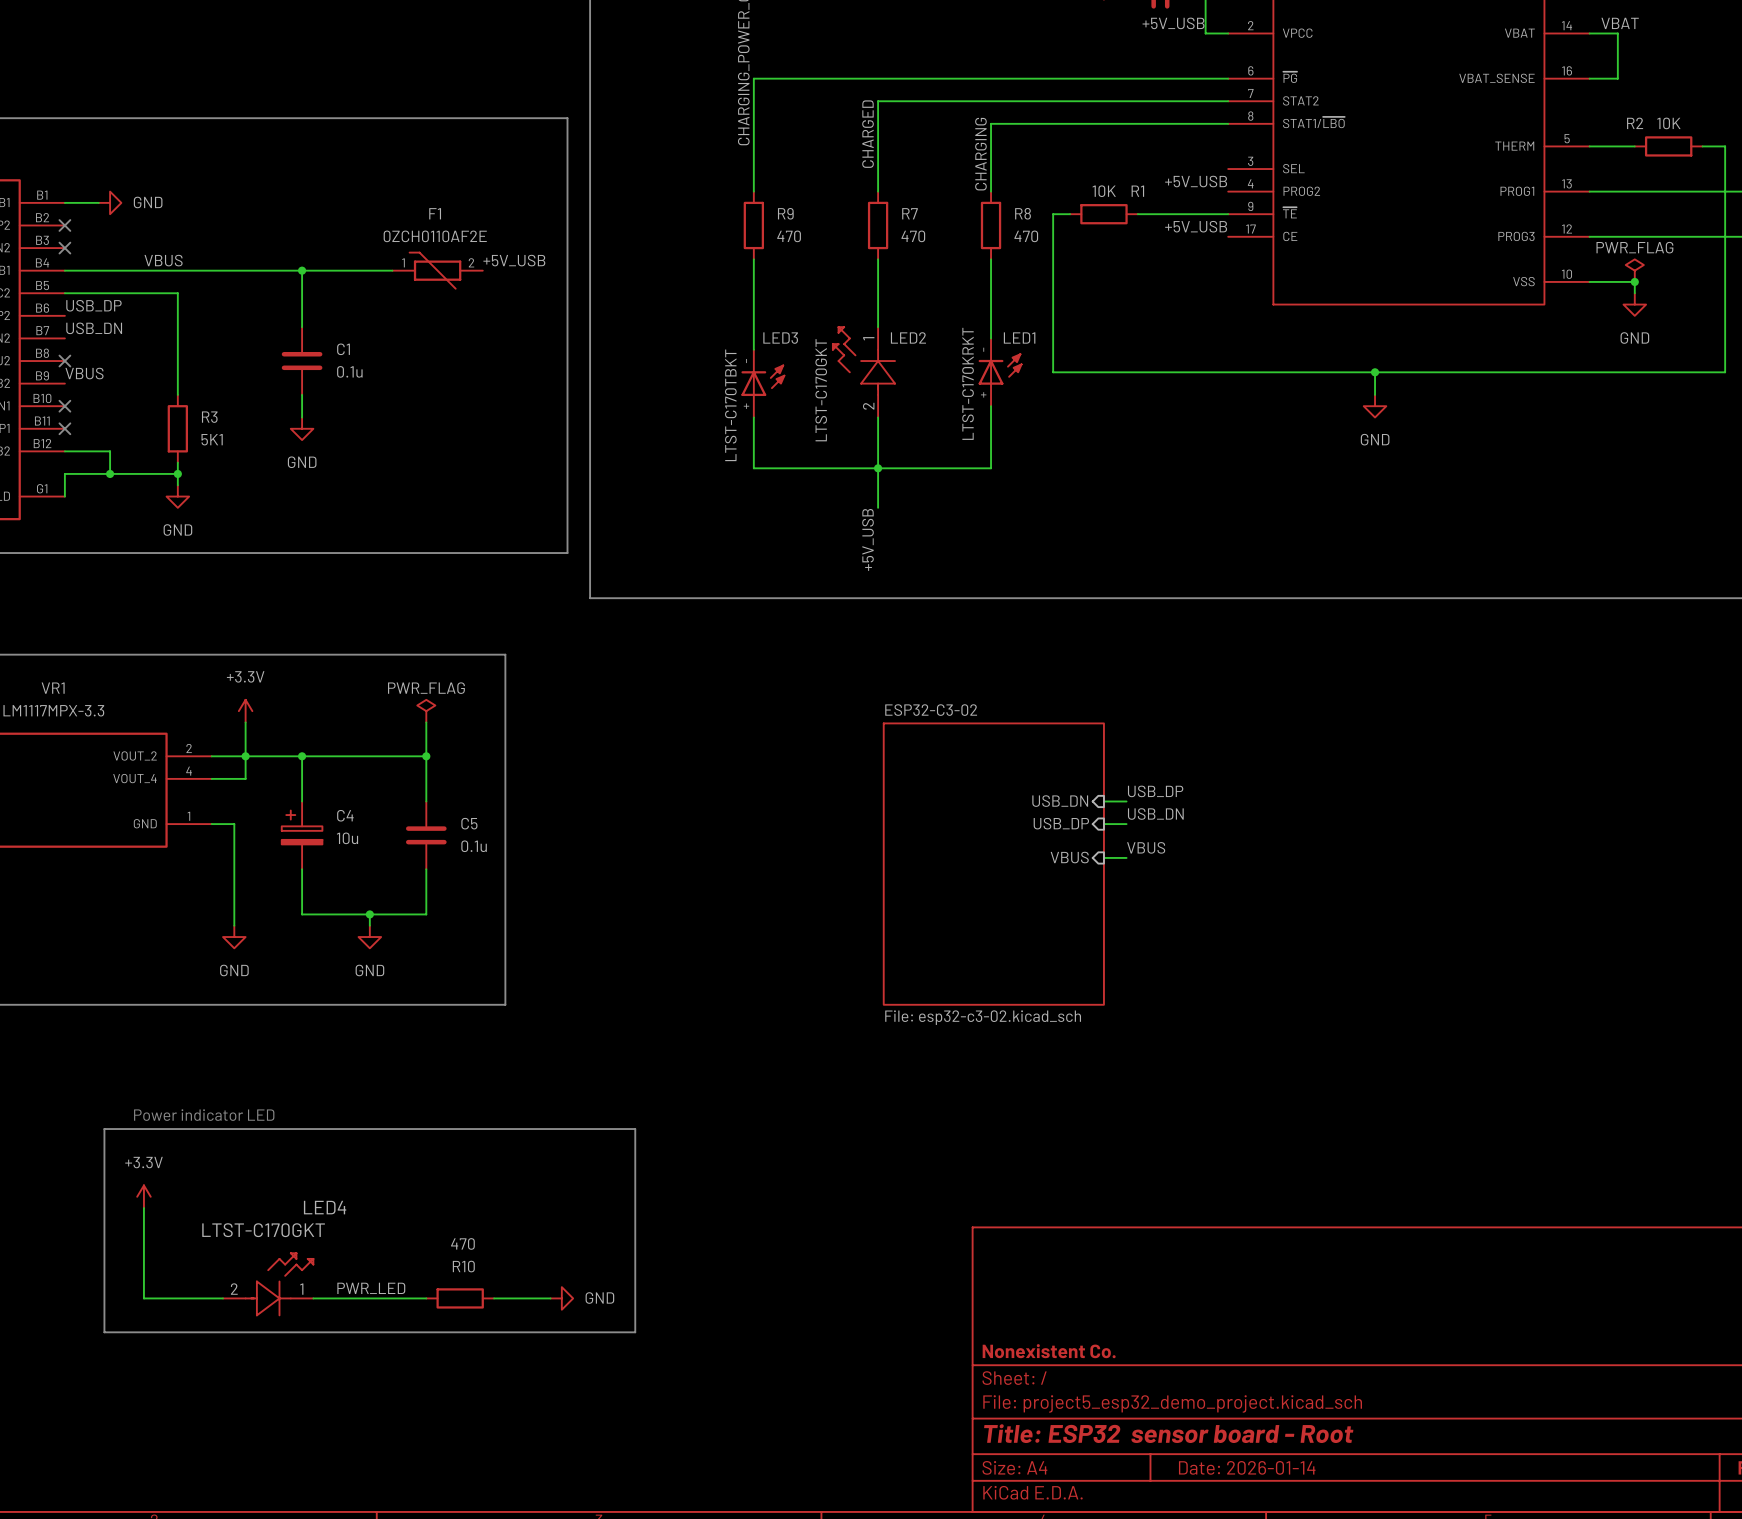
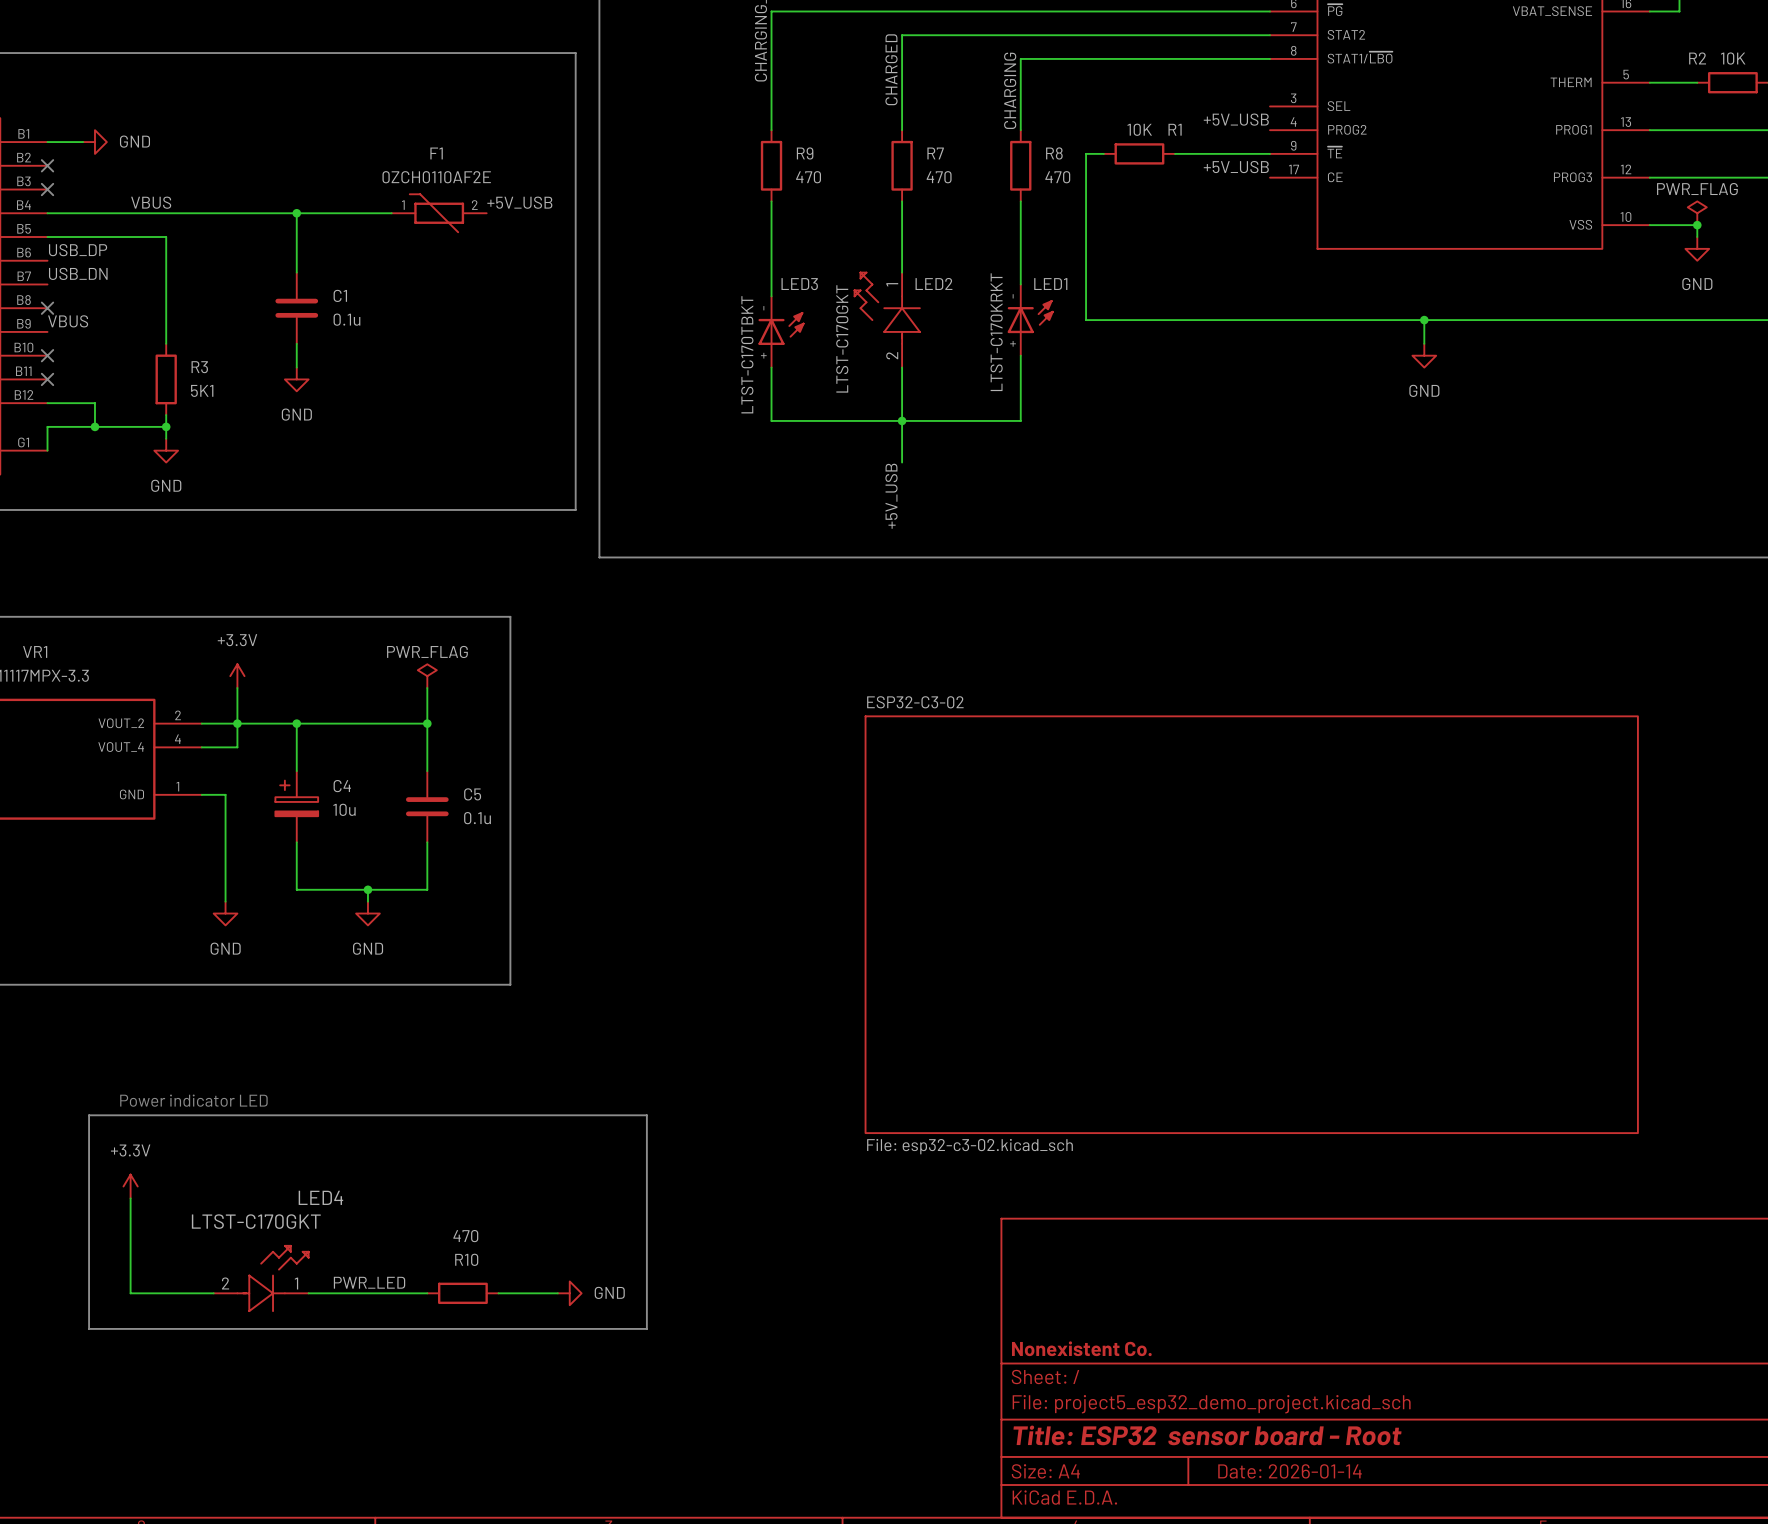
sheet ESP32-C3-02 name position: ESP32-C3-02 (931, 710) -> ESP32-C3-02 (915, 702)
sheet ESP32-C3-02 shape: [883, 722, 1105, 1006] -> [864, 715, 1639, 1134]
label: USB_DP (1155, 791) -> none
sheet pin: USB_DN (1060, 801) -> none
wire: (1103, 801) (1126, 801) -> none
label: USB_DN (1155, 814) -> none
sheet pin: USB_DP (1061, 823) -> none
wire: (1103, 824) (1126, 824) -> none
label: VBUS (1146, 847) -> none
sheet pin: VBUS (1069, 857) -> none
wire: (1103, 857) (1126, 857) -> none
sheet ESP32-C3-02 value position: File: esp32-c3-02.kicad_sch (983, 1017) -> File: esp32-c3-02.kicad_sch (969, 1146)

